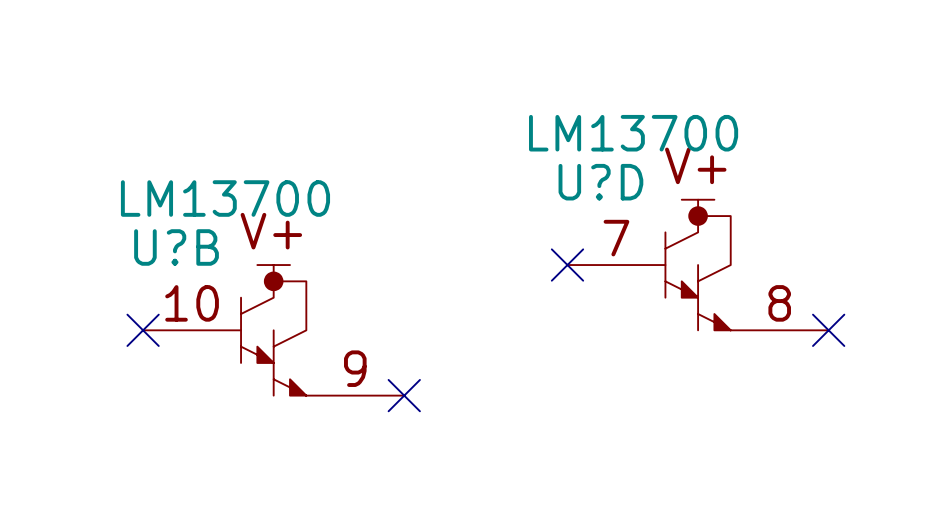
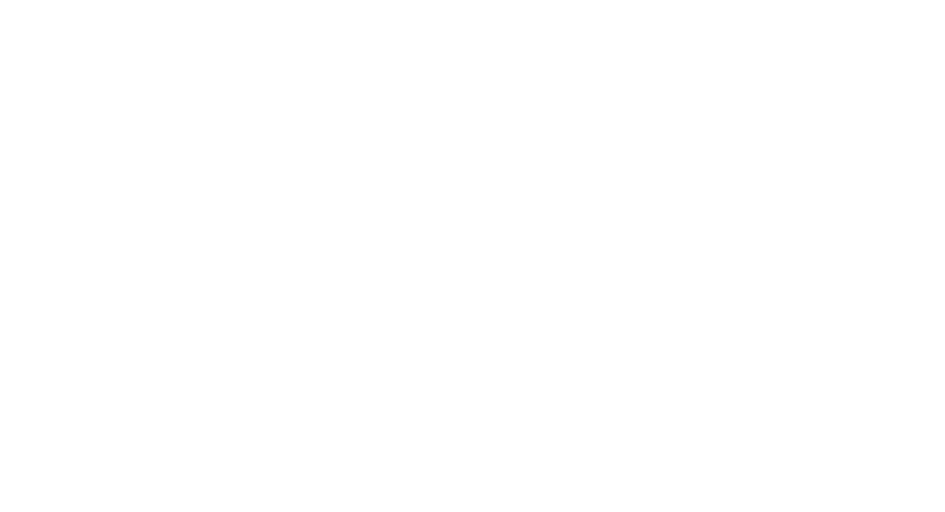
no-connect mark: (567, 265) -> none
U?D: LM13700 (698, 265) -> none
no-connect mark: (143, 330) -> none
U?B: LM13700 (273, 330) -> none
no-connect mark: (828, 330) -> none
no-connect mark: (404, 395) -> none

